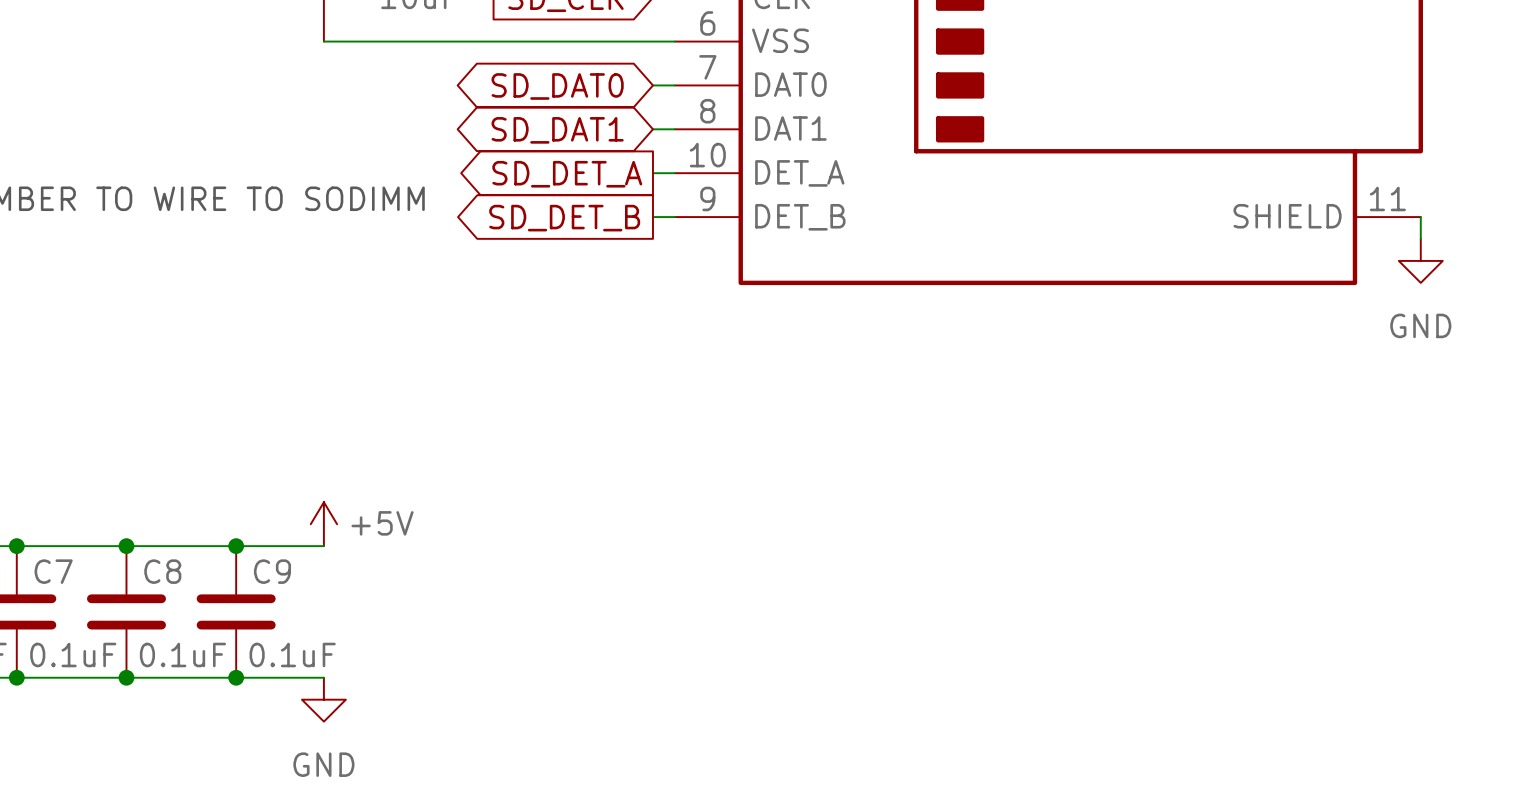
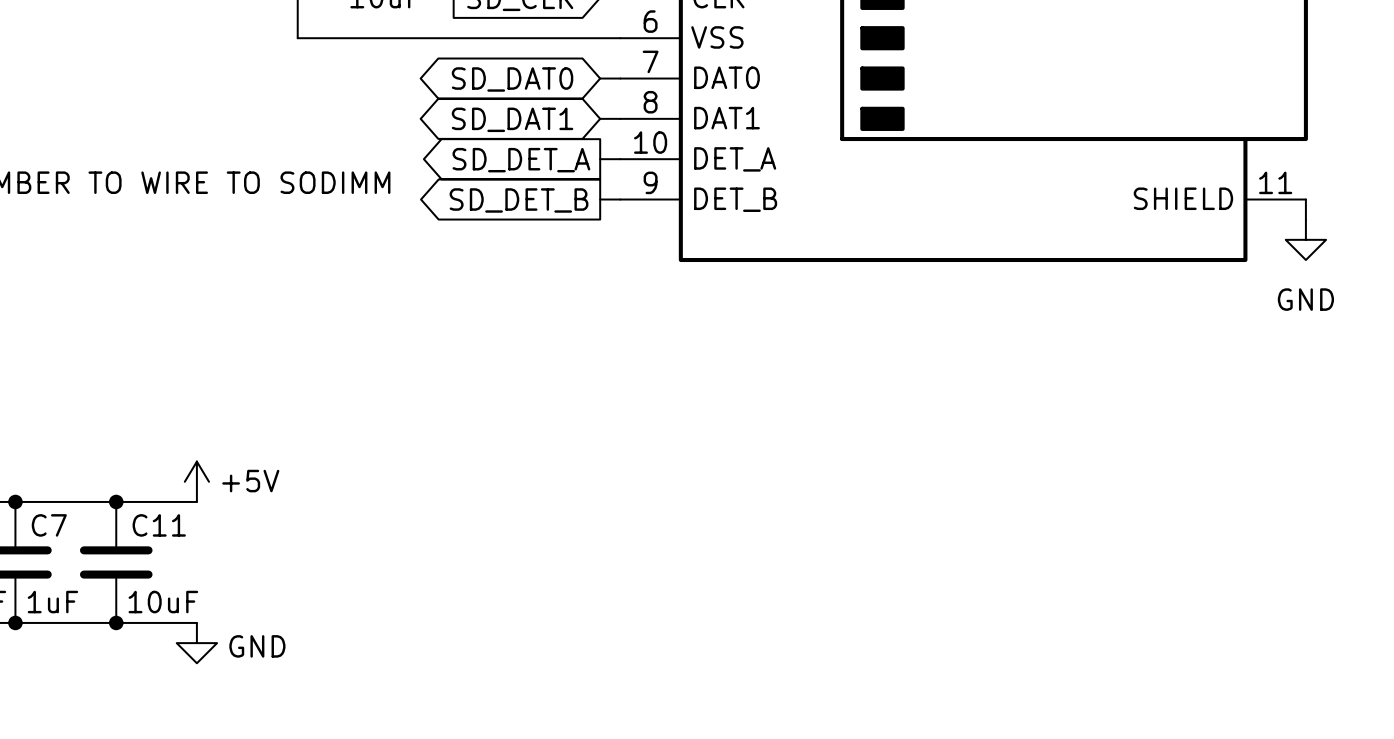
power symbol position: +5V (323, 524) -> +5V (196, 481)
wire: (214, 546) (323, 546) -> none
junction: (236, 546) -> none
C8 name: C8 (162, 571) -> C11 (159, 525)
C9: 0.1uF (236, 611) -> none
C7 value: 0.1uF (73, 654) -> 1uF (52, 602)
C8 value: 0.1uF (182, 654) -> 10uF (163, 602)
wire: (214, 677) (323, 677) -> none
junction: (236, 677) -> none
power symbol position: GND (323, 699) -> GND (196, 643)
power symbol text position: GND (323, 764) -> GND (257, 646)

